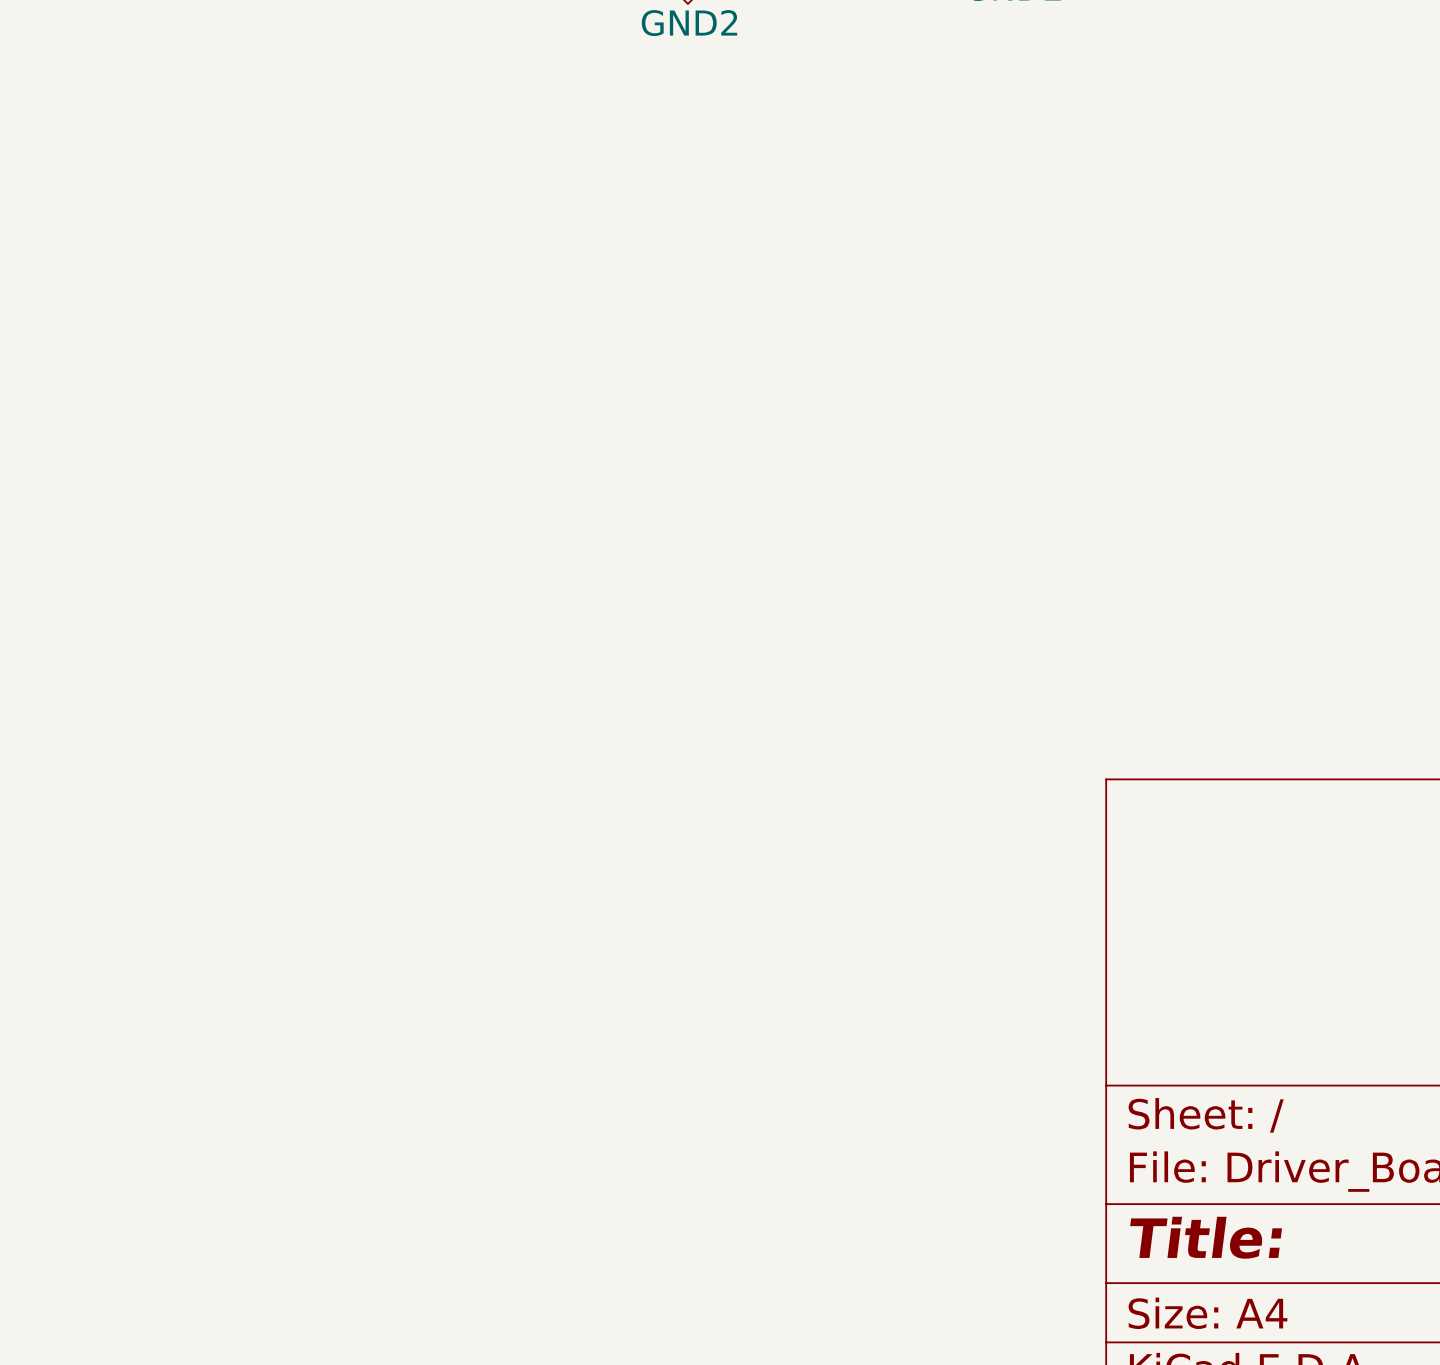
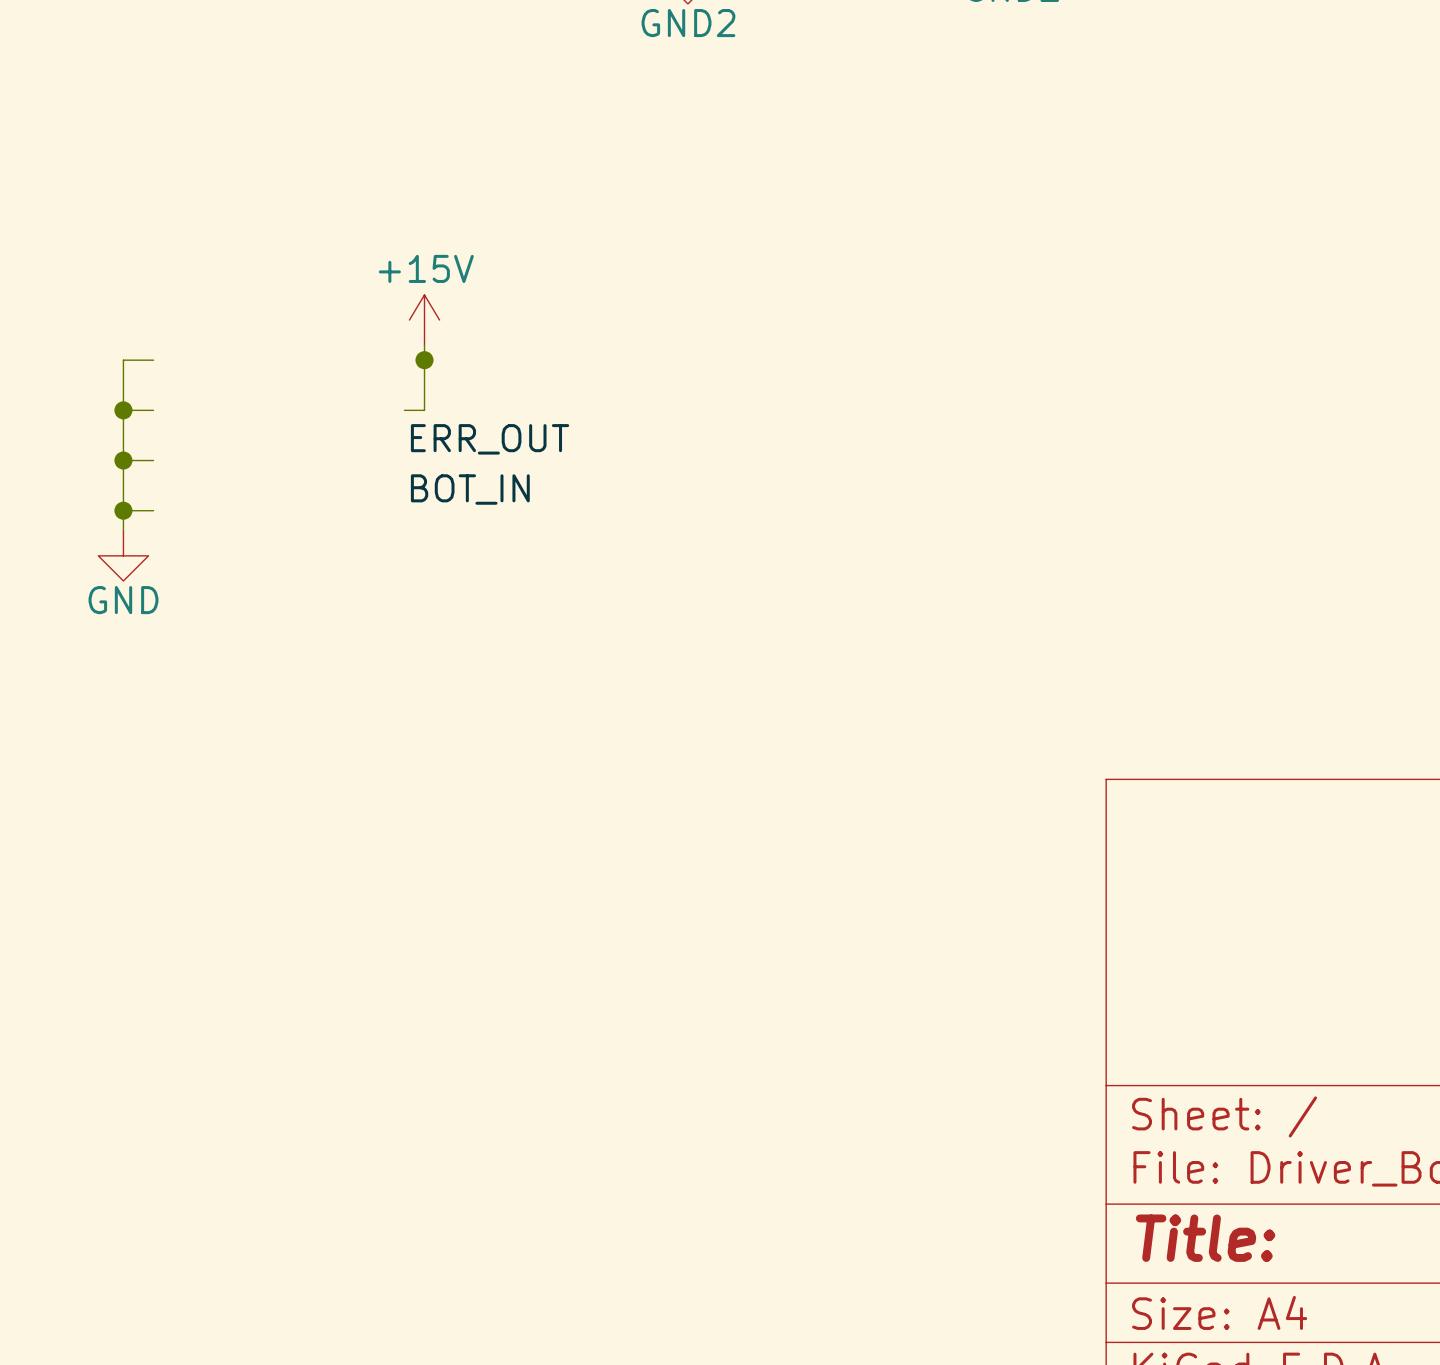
power symbol: none -> +15V (424, 320)
wire: none -> (424, 345) (424, 410) (404, 410)
wire: none -> (153, 360) (123, 360) (123, 530)
junction: none -> (424, 360)
wire: none -> (123, 410) (153, 410)
junction: none -> (123, 410)
label: none -> ERR_OUT (490, 439)
wire: none -> (123, 460) (153, 460)
junction: none -> (123, 460)
label: none -> BOT_IN (470, 489)
wire: none -> (123, 510) (153, 510)
junction: none -> (123, 510)
power symbol: none -> GND (123, 555)

